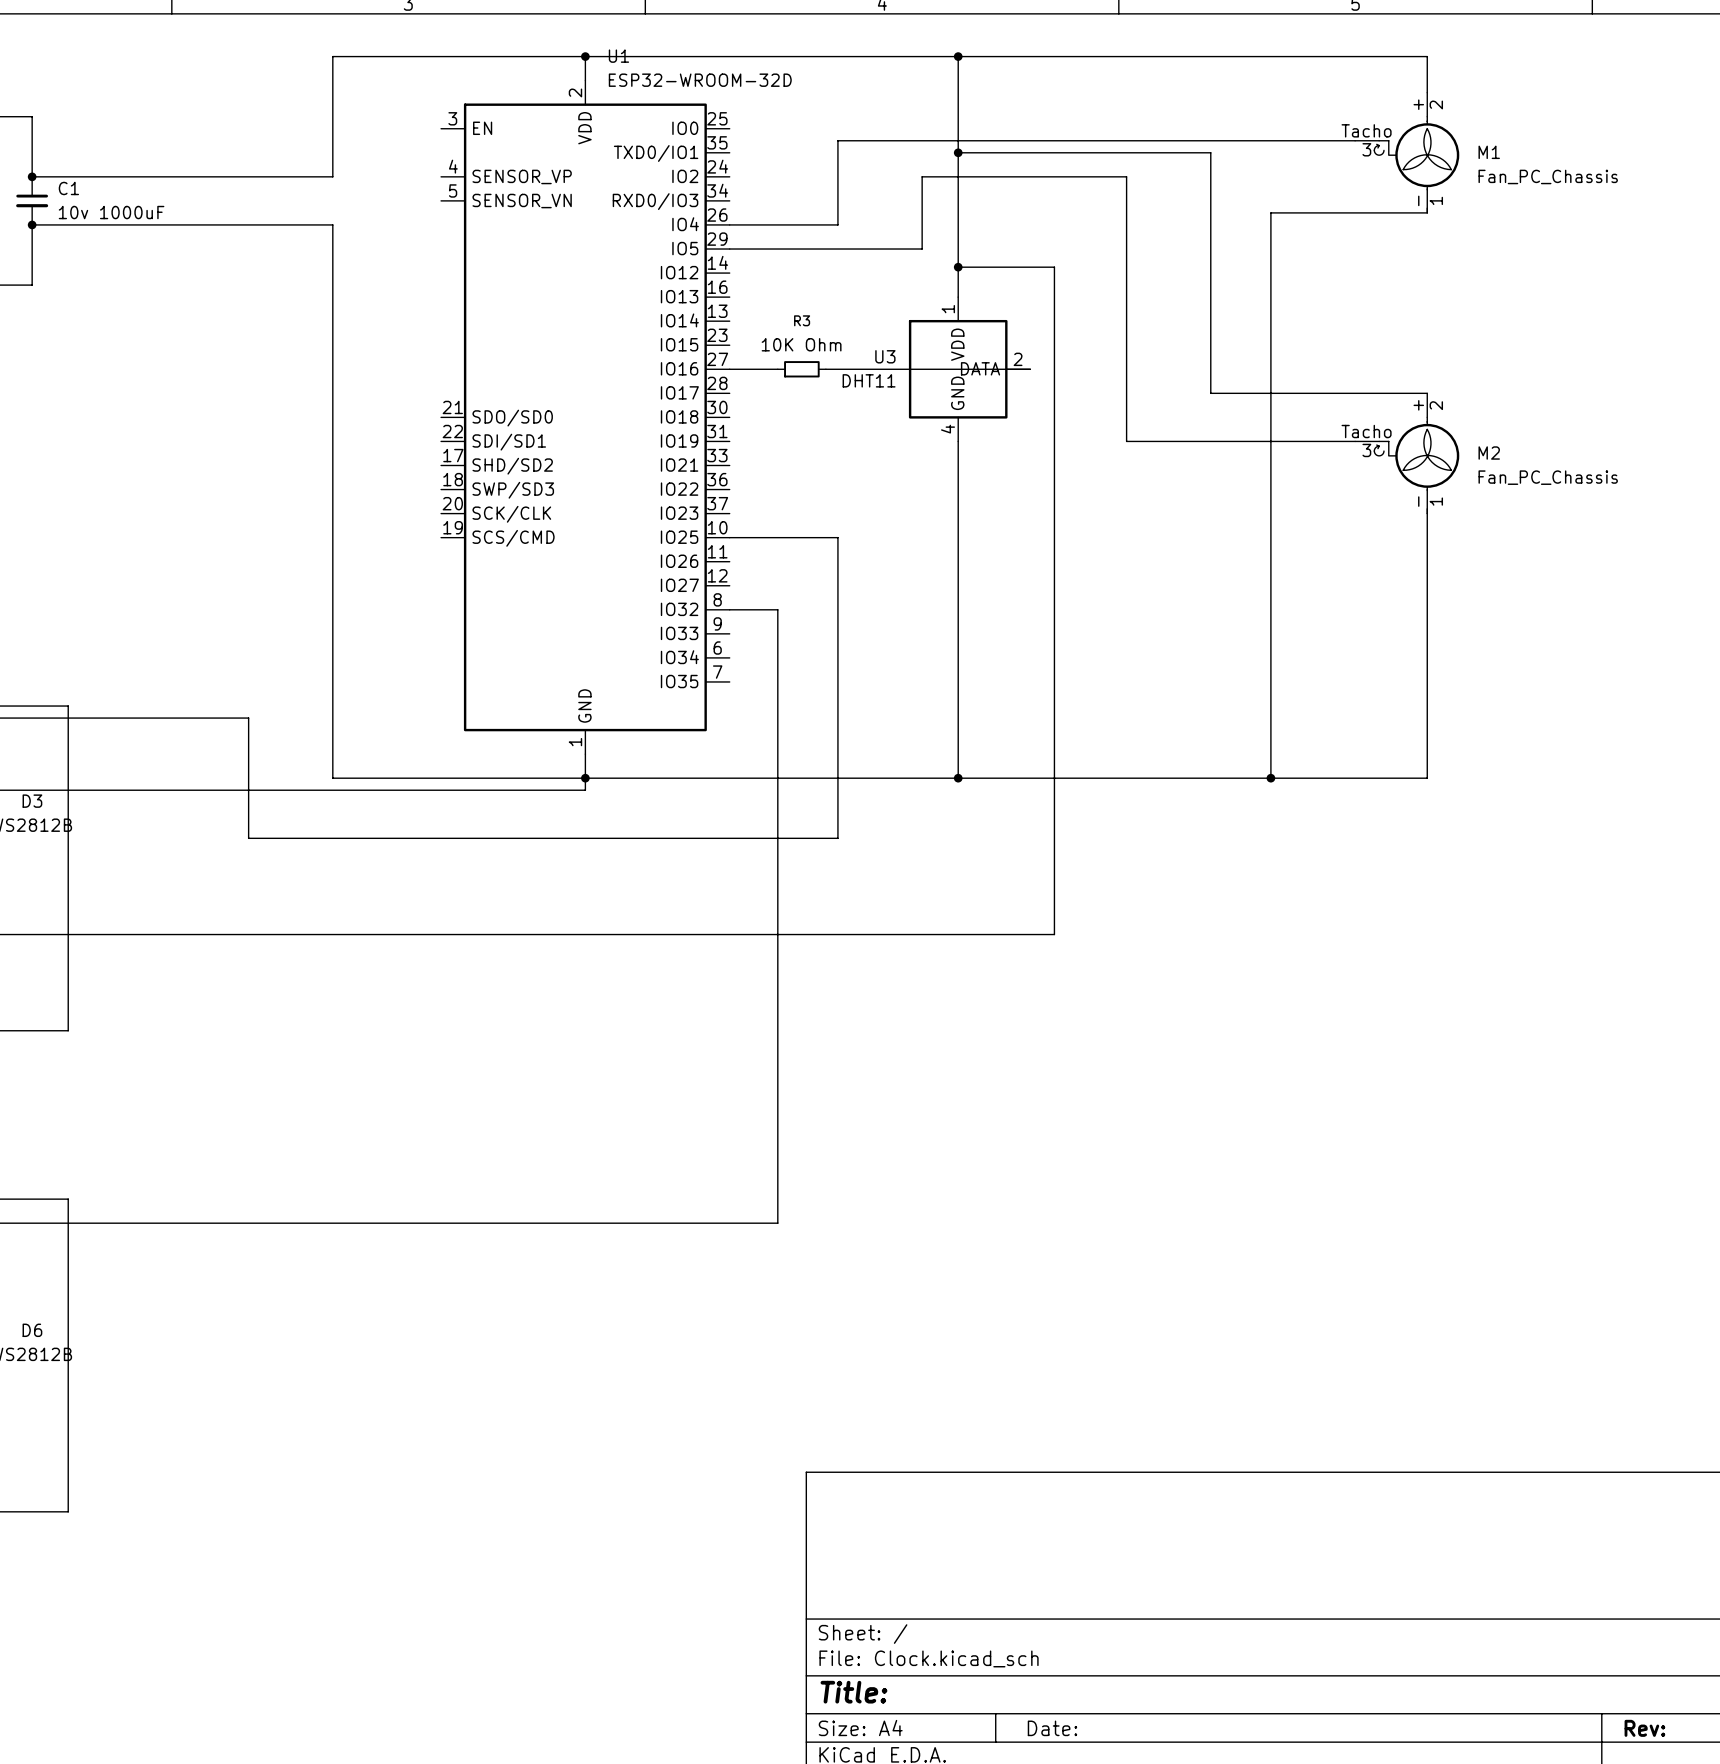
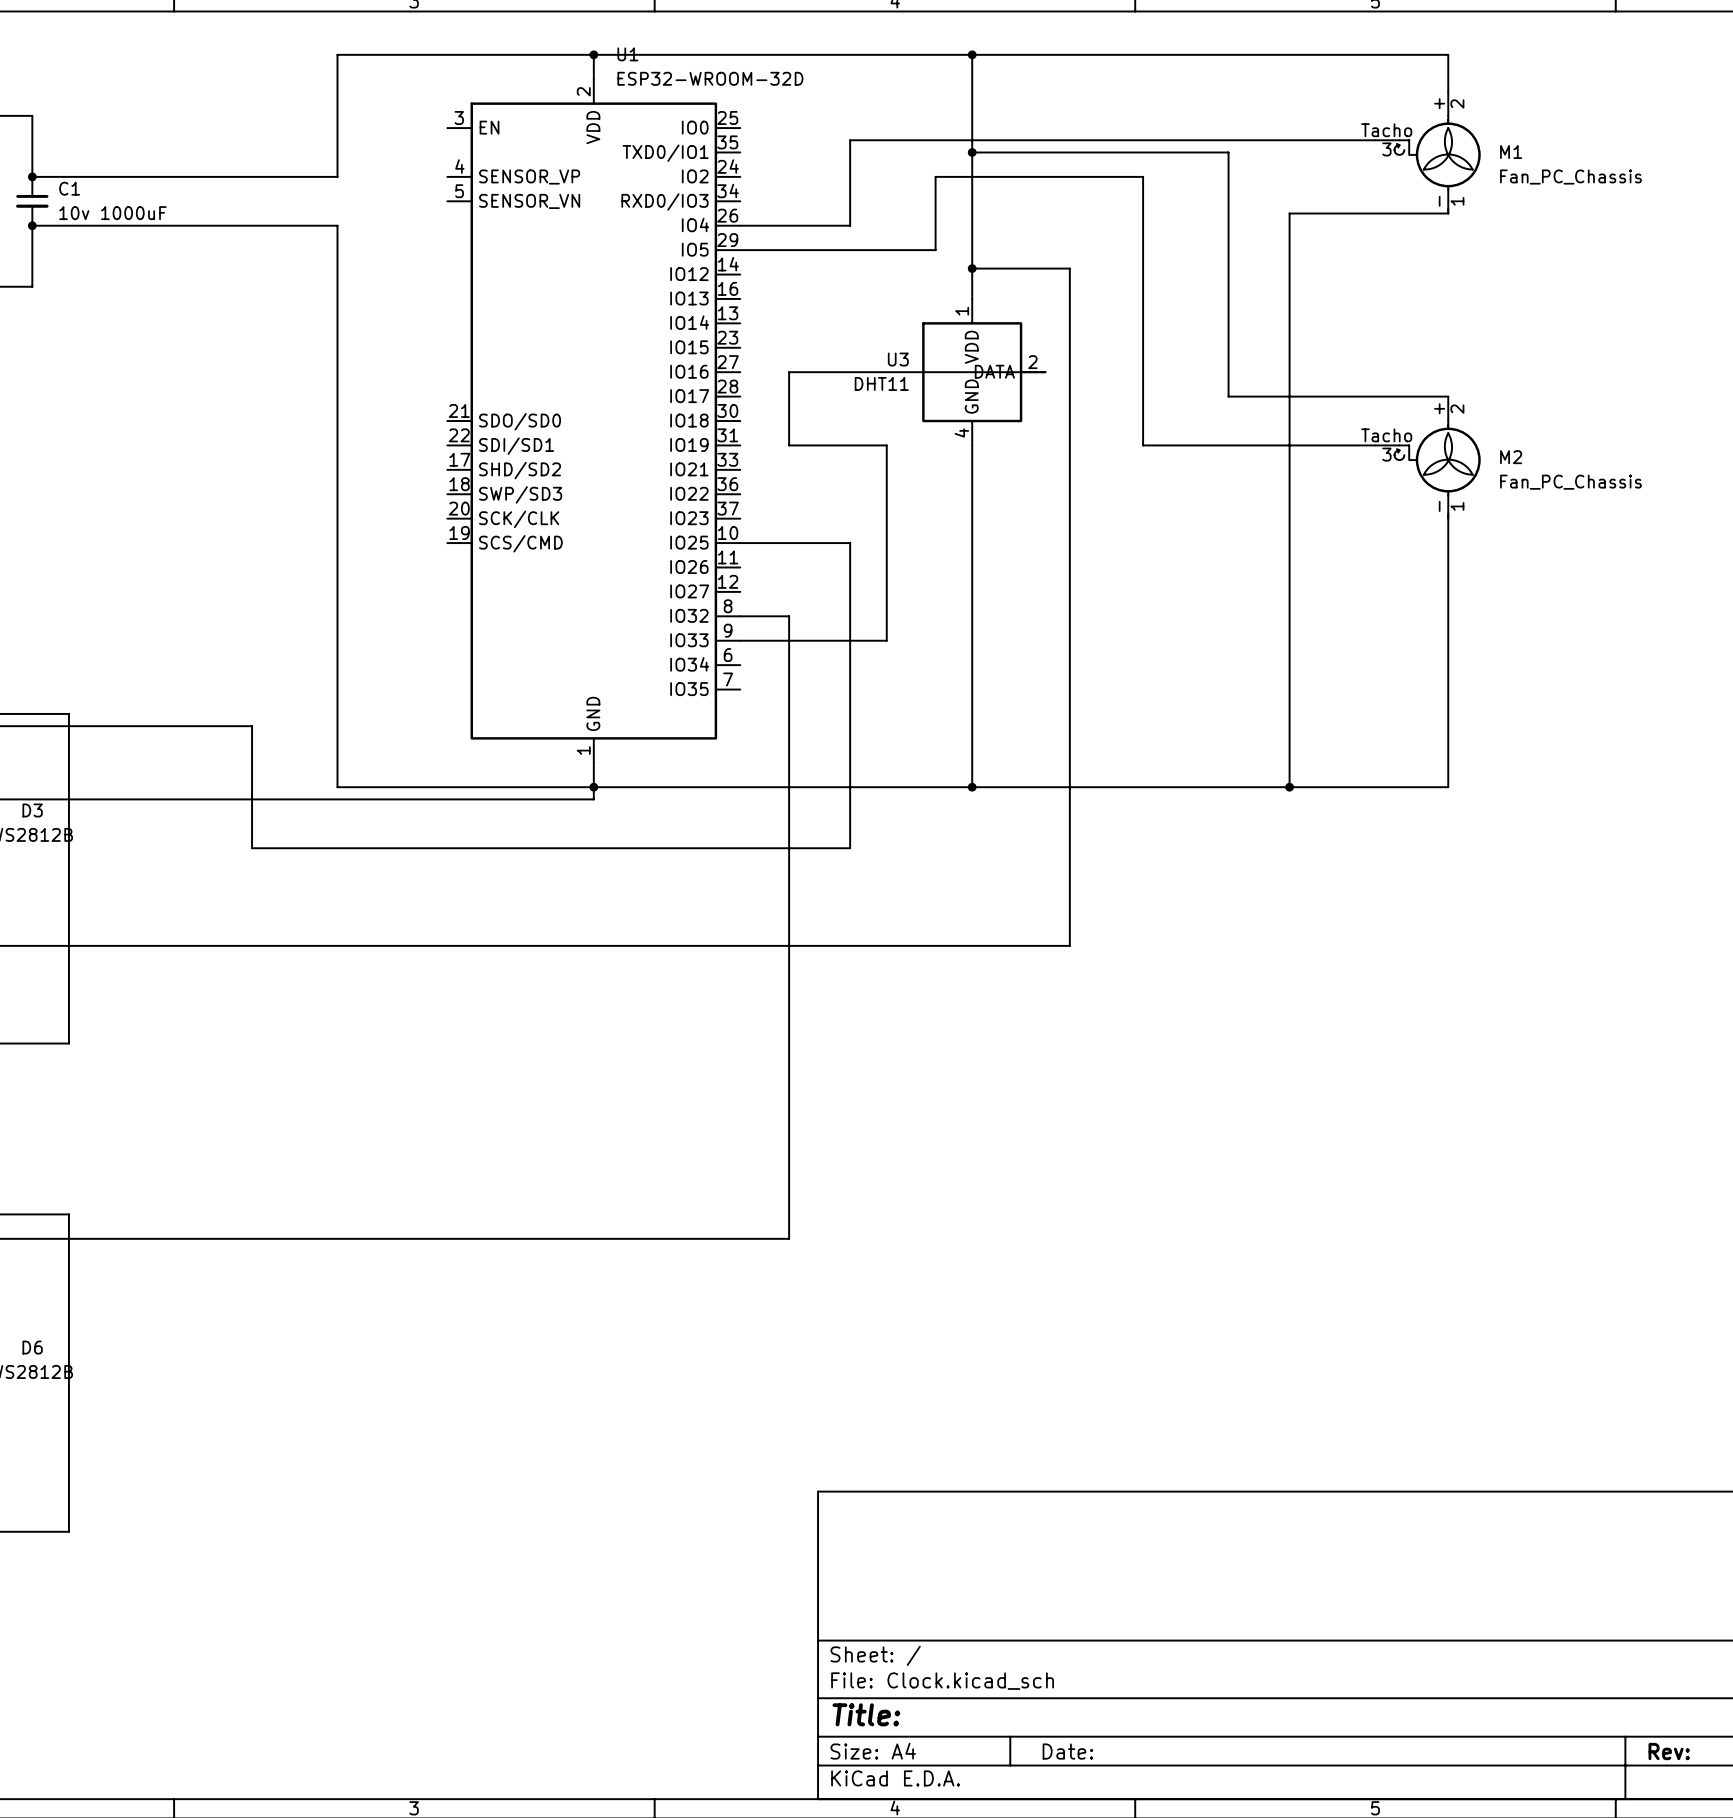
wire: (729, 369) (777, 369) -> none
R3: 10K Ohm (801, 369) -> none
wire: none -> (837, 372) (789, 372) (789, 445) (886, 445) (886, 640) (740, 640)

